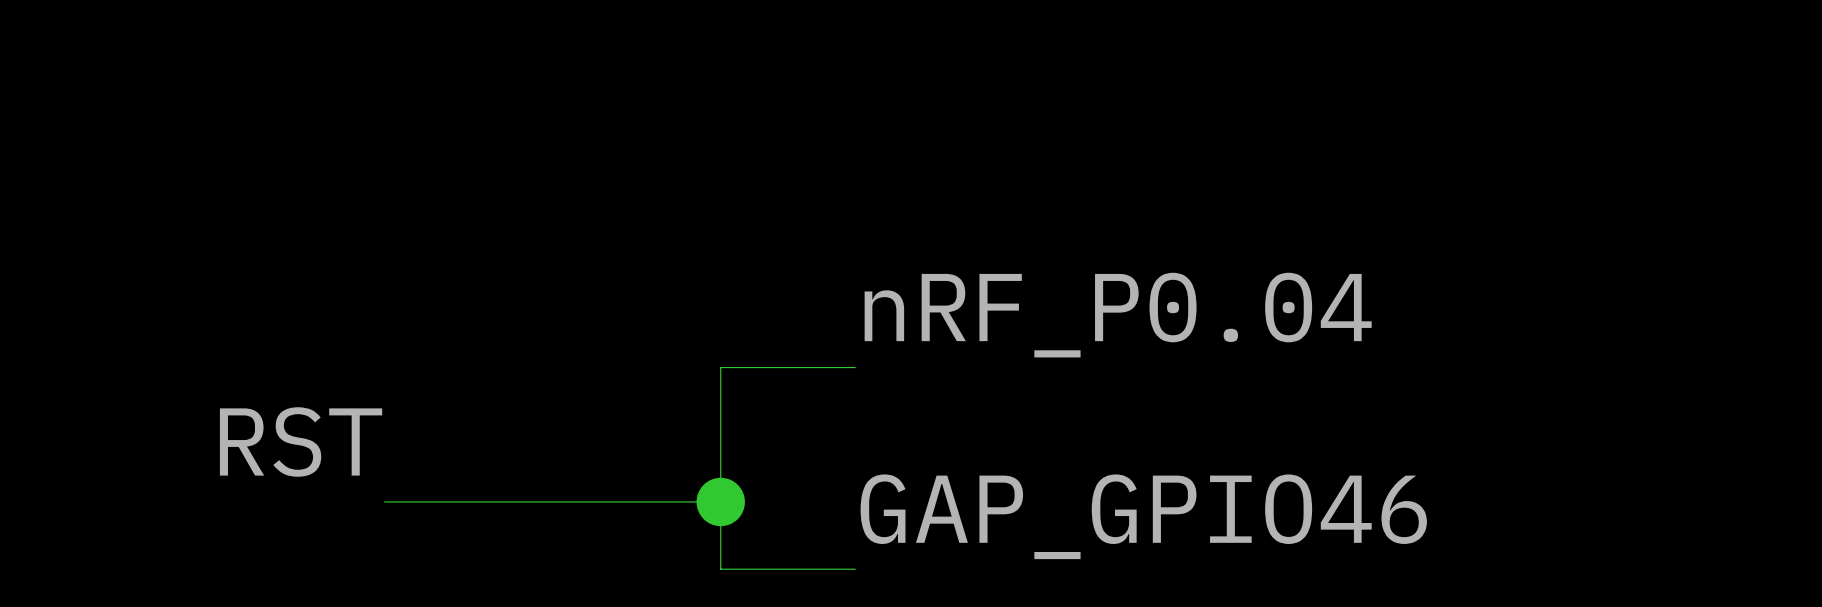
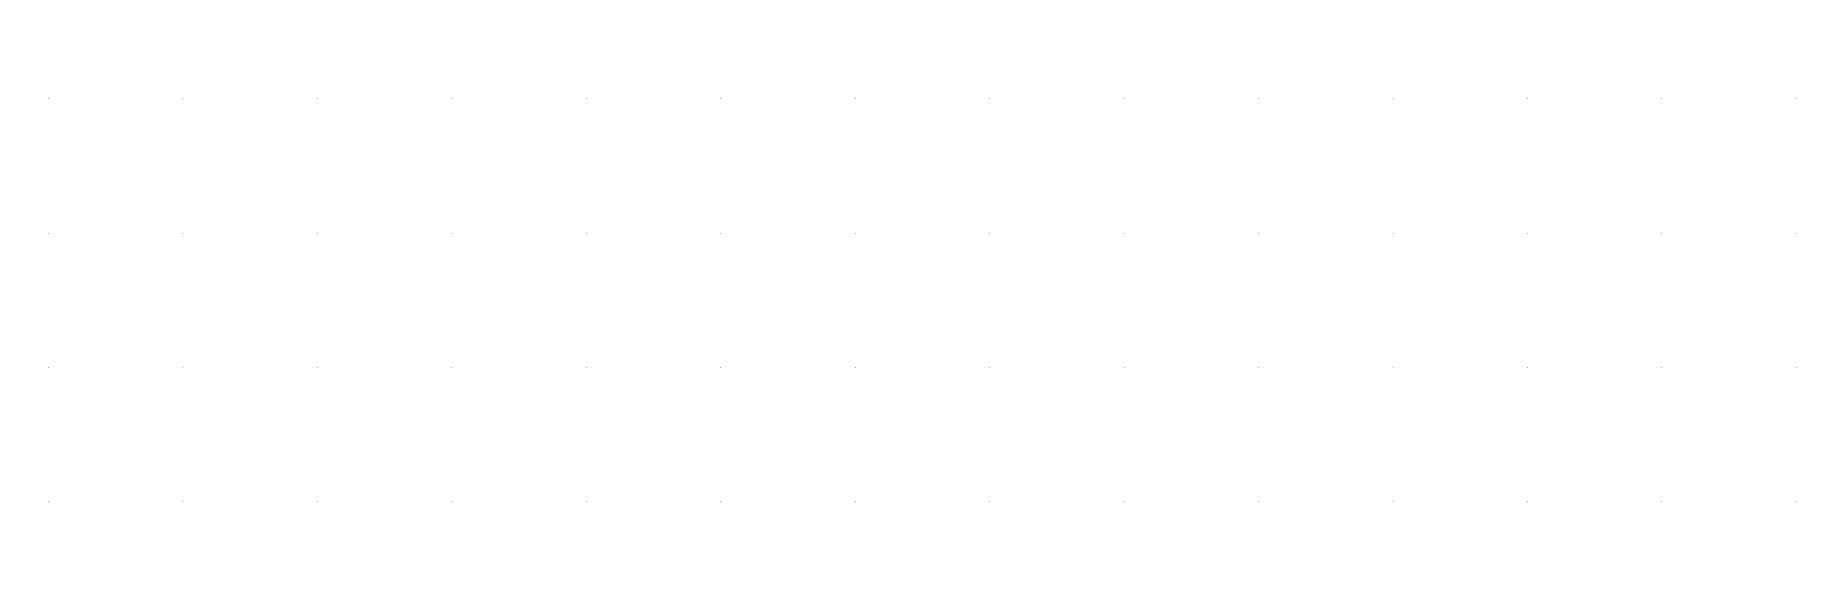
label: nRF_P0.04 (1118, 315) -> none
wire: (855, 367) (720, 367) (720, 569) (855, 569) -> none
label: RST (301, 441) -> none
wire: (384, 501) (720, 501) -> none
junction: (720, 501) -> none
label: GAP_GPIO46 (1143, 516) -> none

